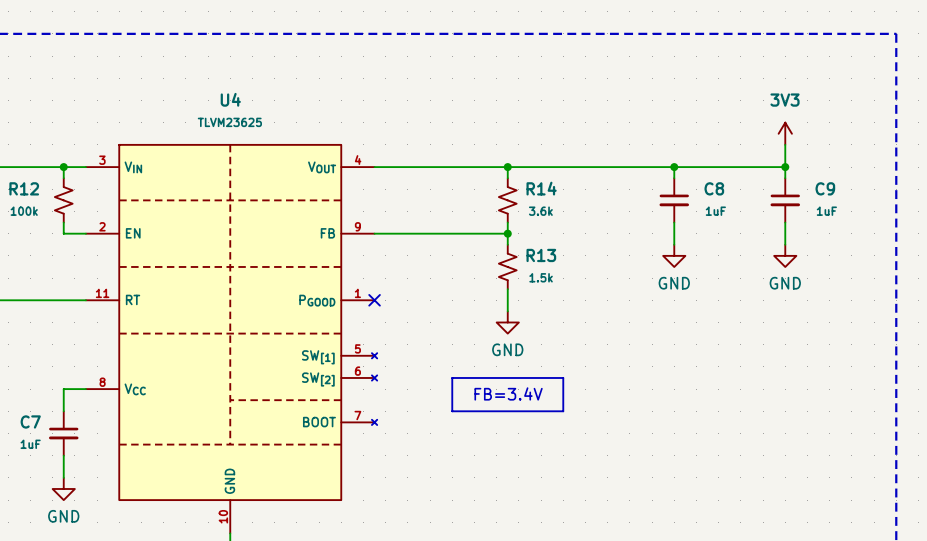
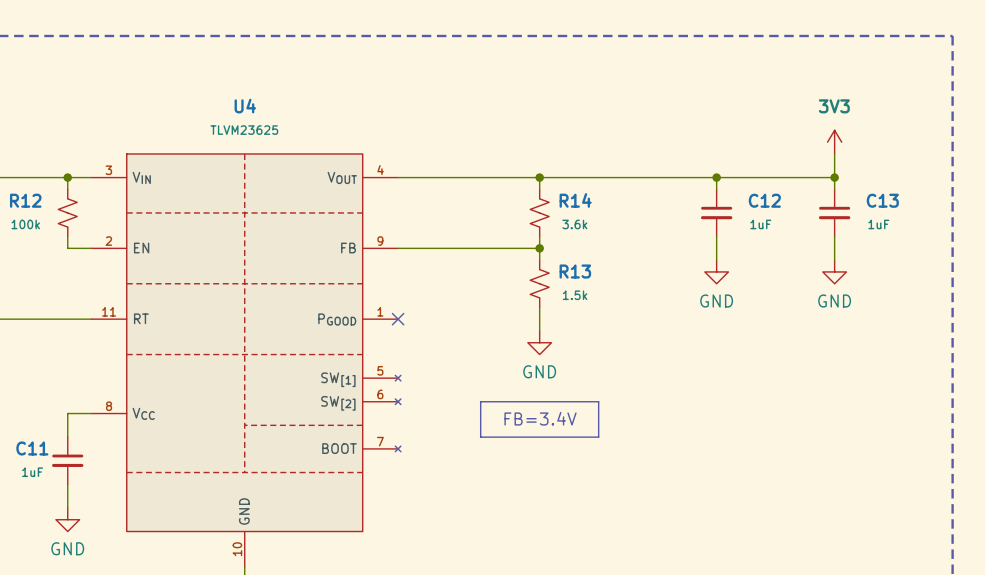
C8 name: C8 (714, 188) -> C12 (764, 200)
C9 name: C9 (825, 188) -> C13 (882, 200)
C7 name: C7 (30, 421) -> C11 (32, 448)

